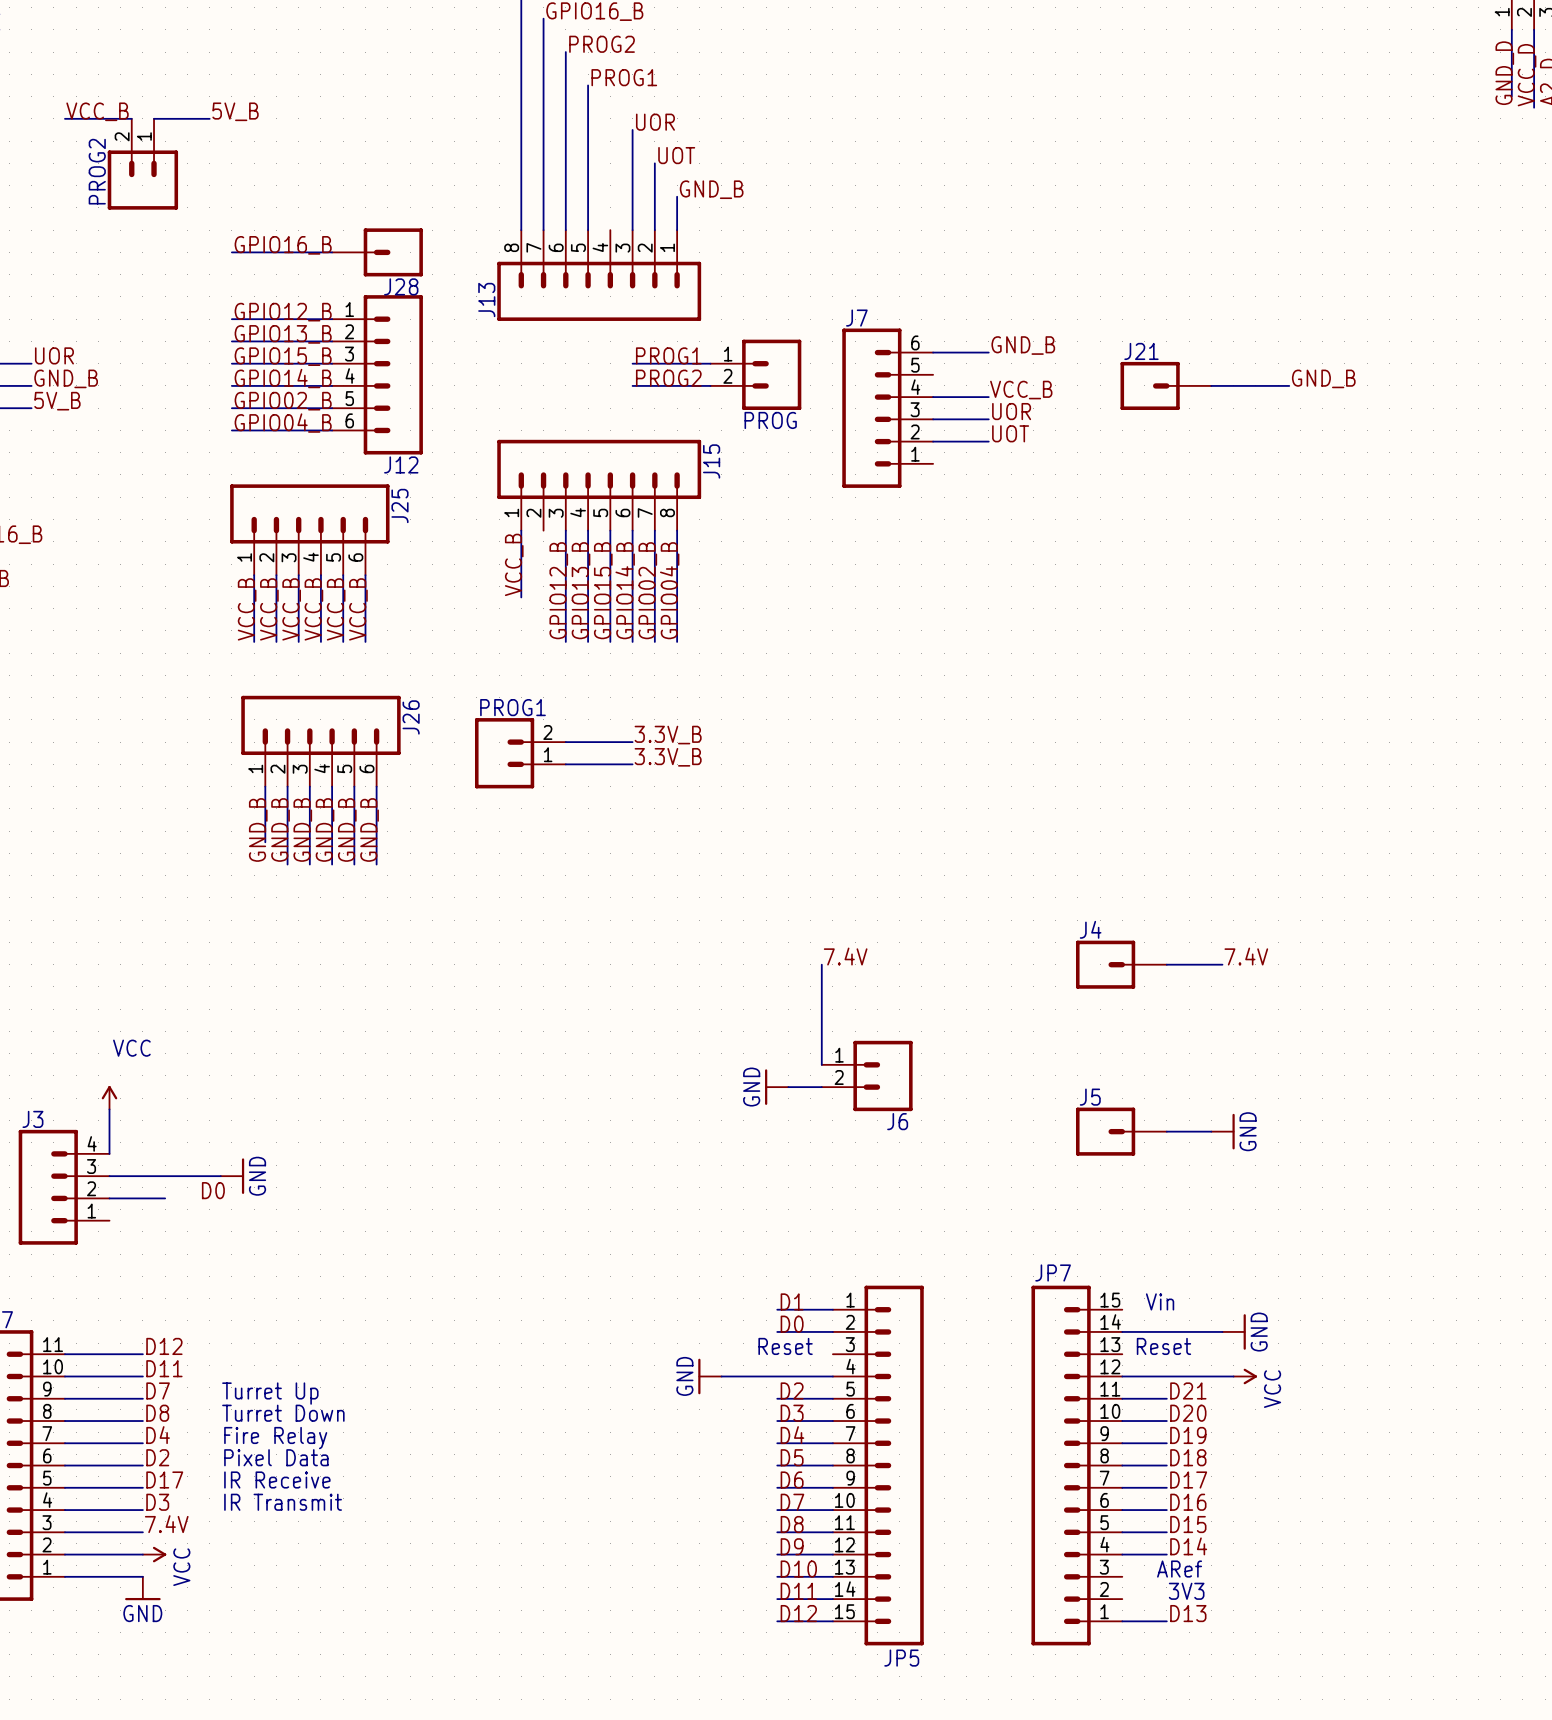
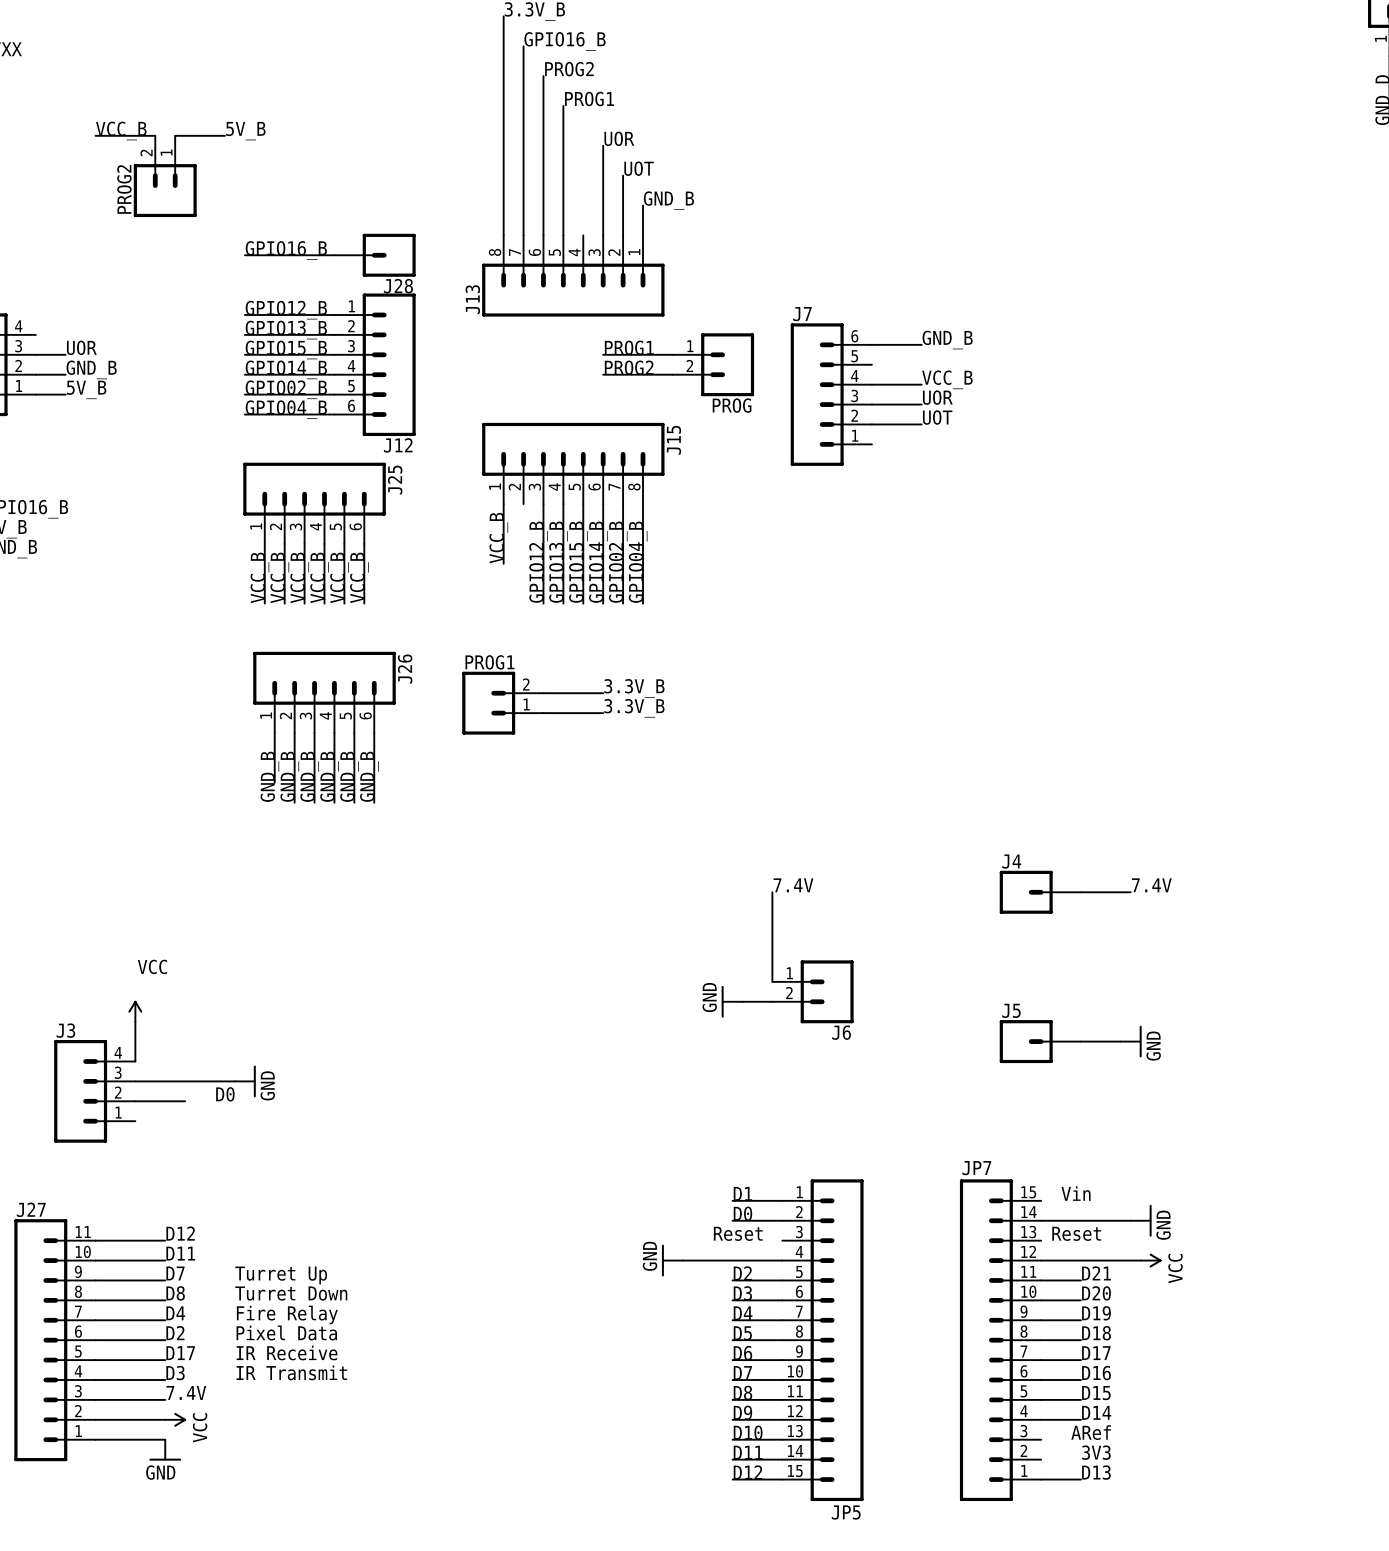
label: GND_B (1323, 378) -> none
J21: (1165, 385) -> none
wire: (1211, 385) (1289, 385) -> none

